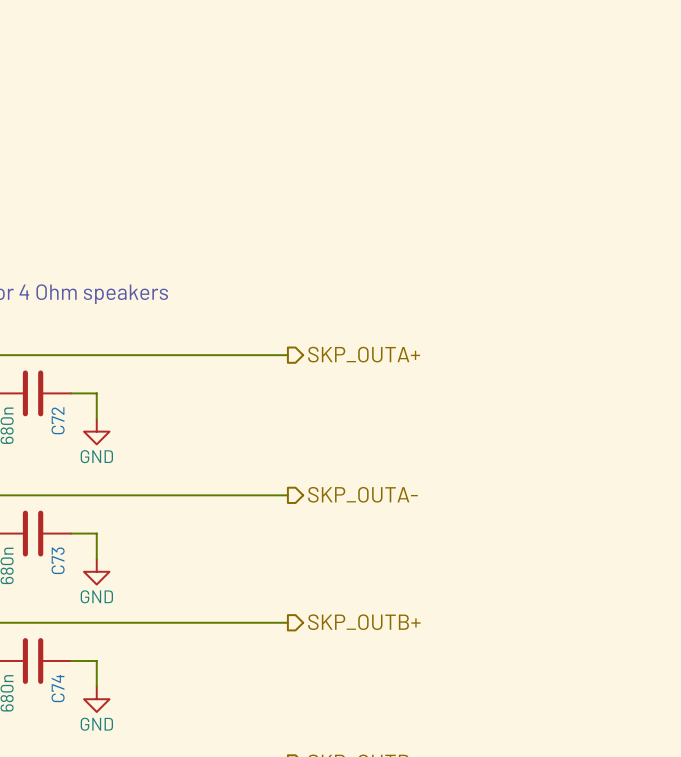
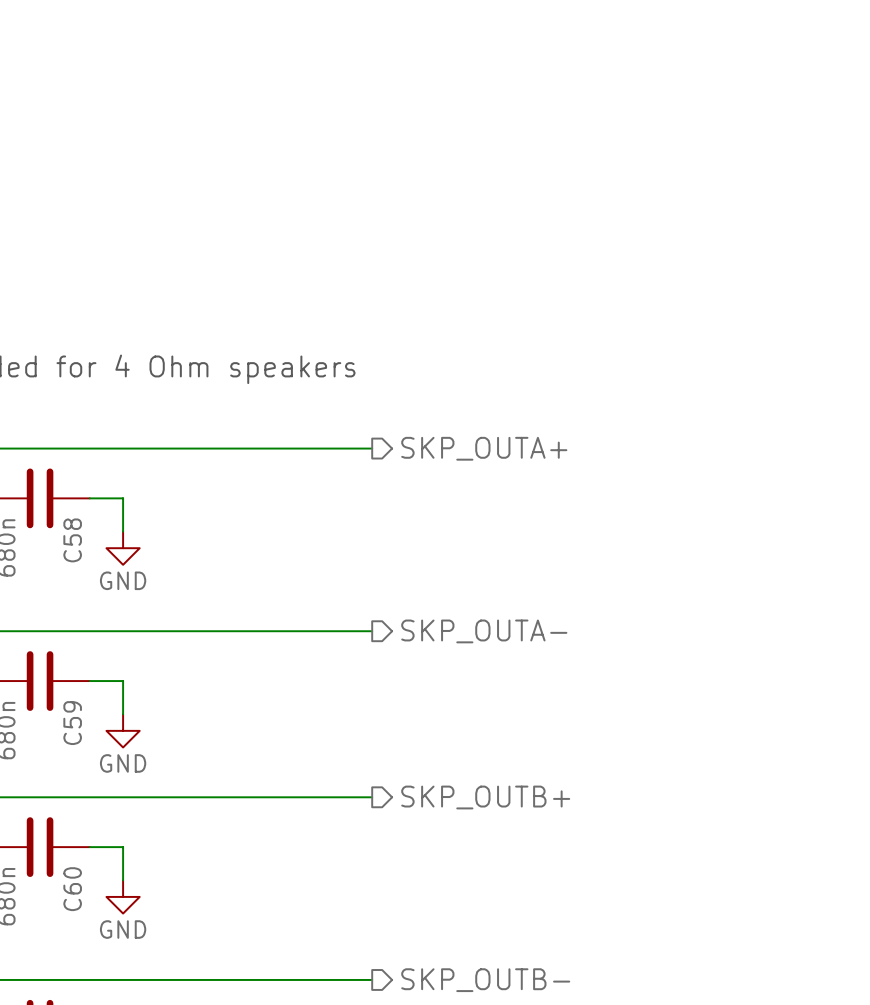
C72 name: C72 (58, 420) -> C58 (72, 540)
C73 name: C73 (58, 560) -> C59 (72, 723)
C74 name: C74 (58, 688) -> C60 (72, 889)

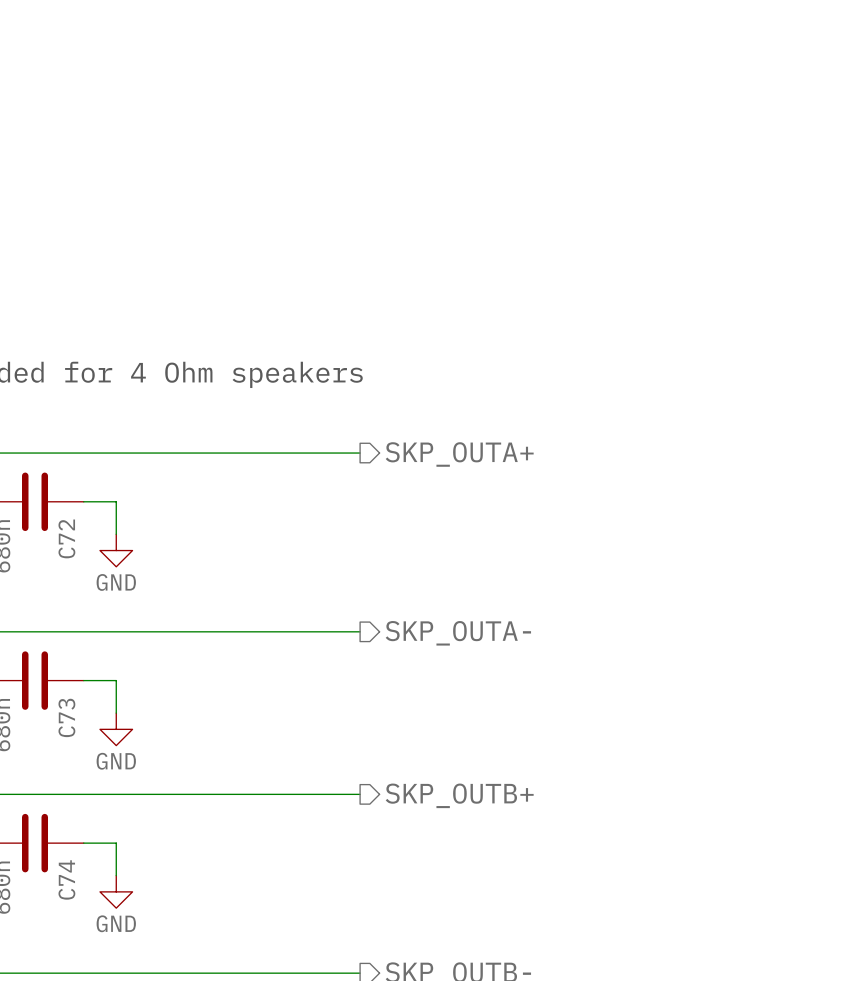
C58 name: C58 (72, 540) -> C72 (66, 538)
C59 name: C59 (72, 723) -> C73 (66, 717)
C60 name: C60 (72, 889) -> C74 (66, 879)

